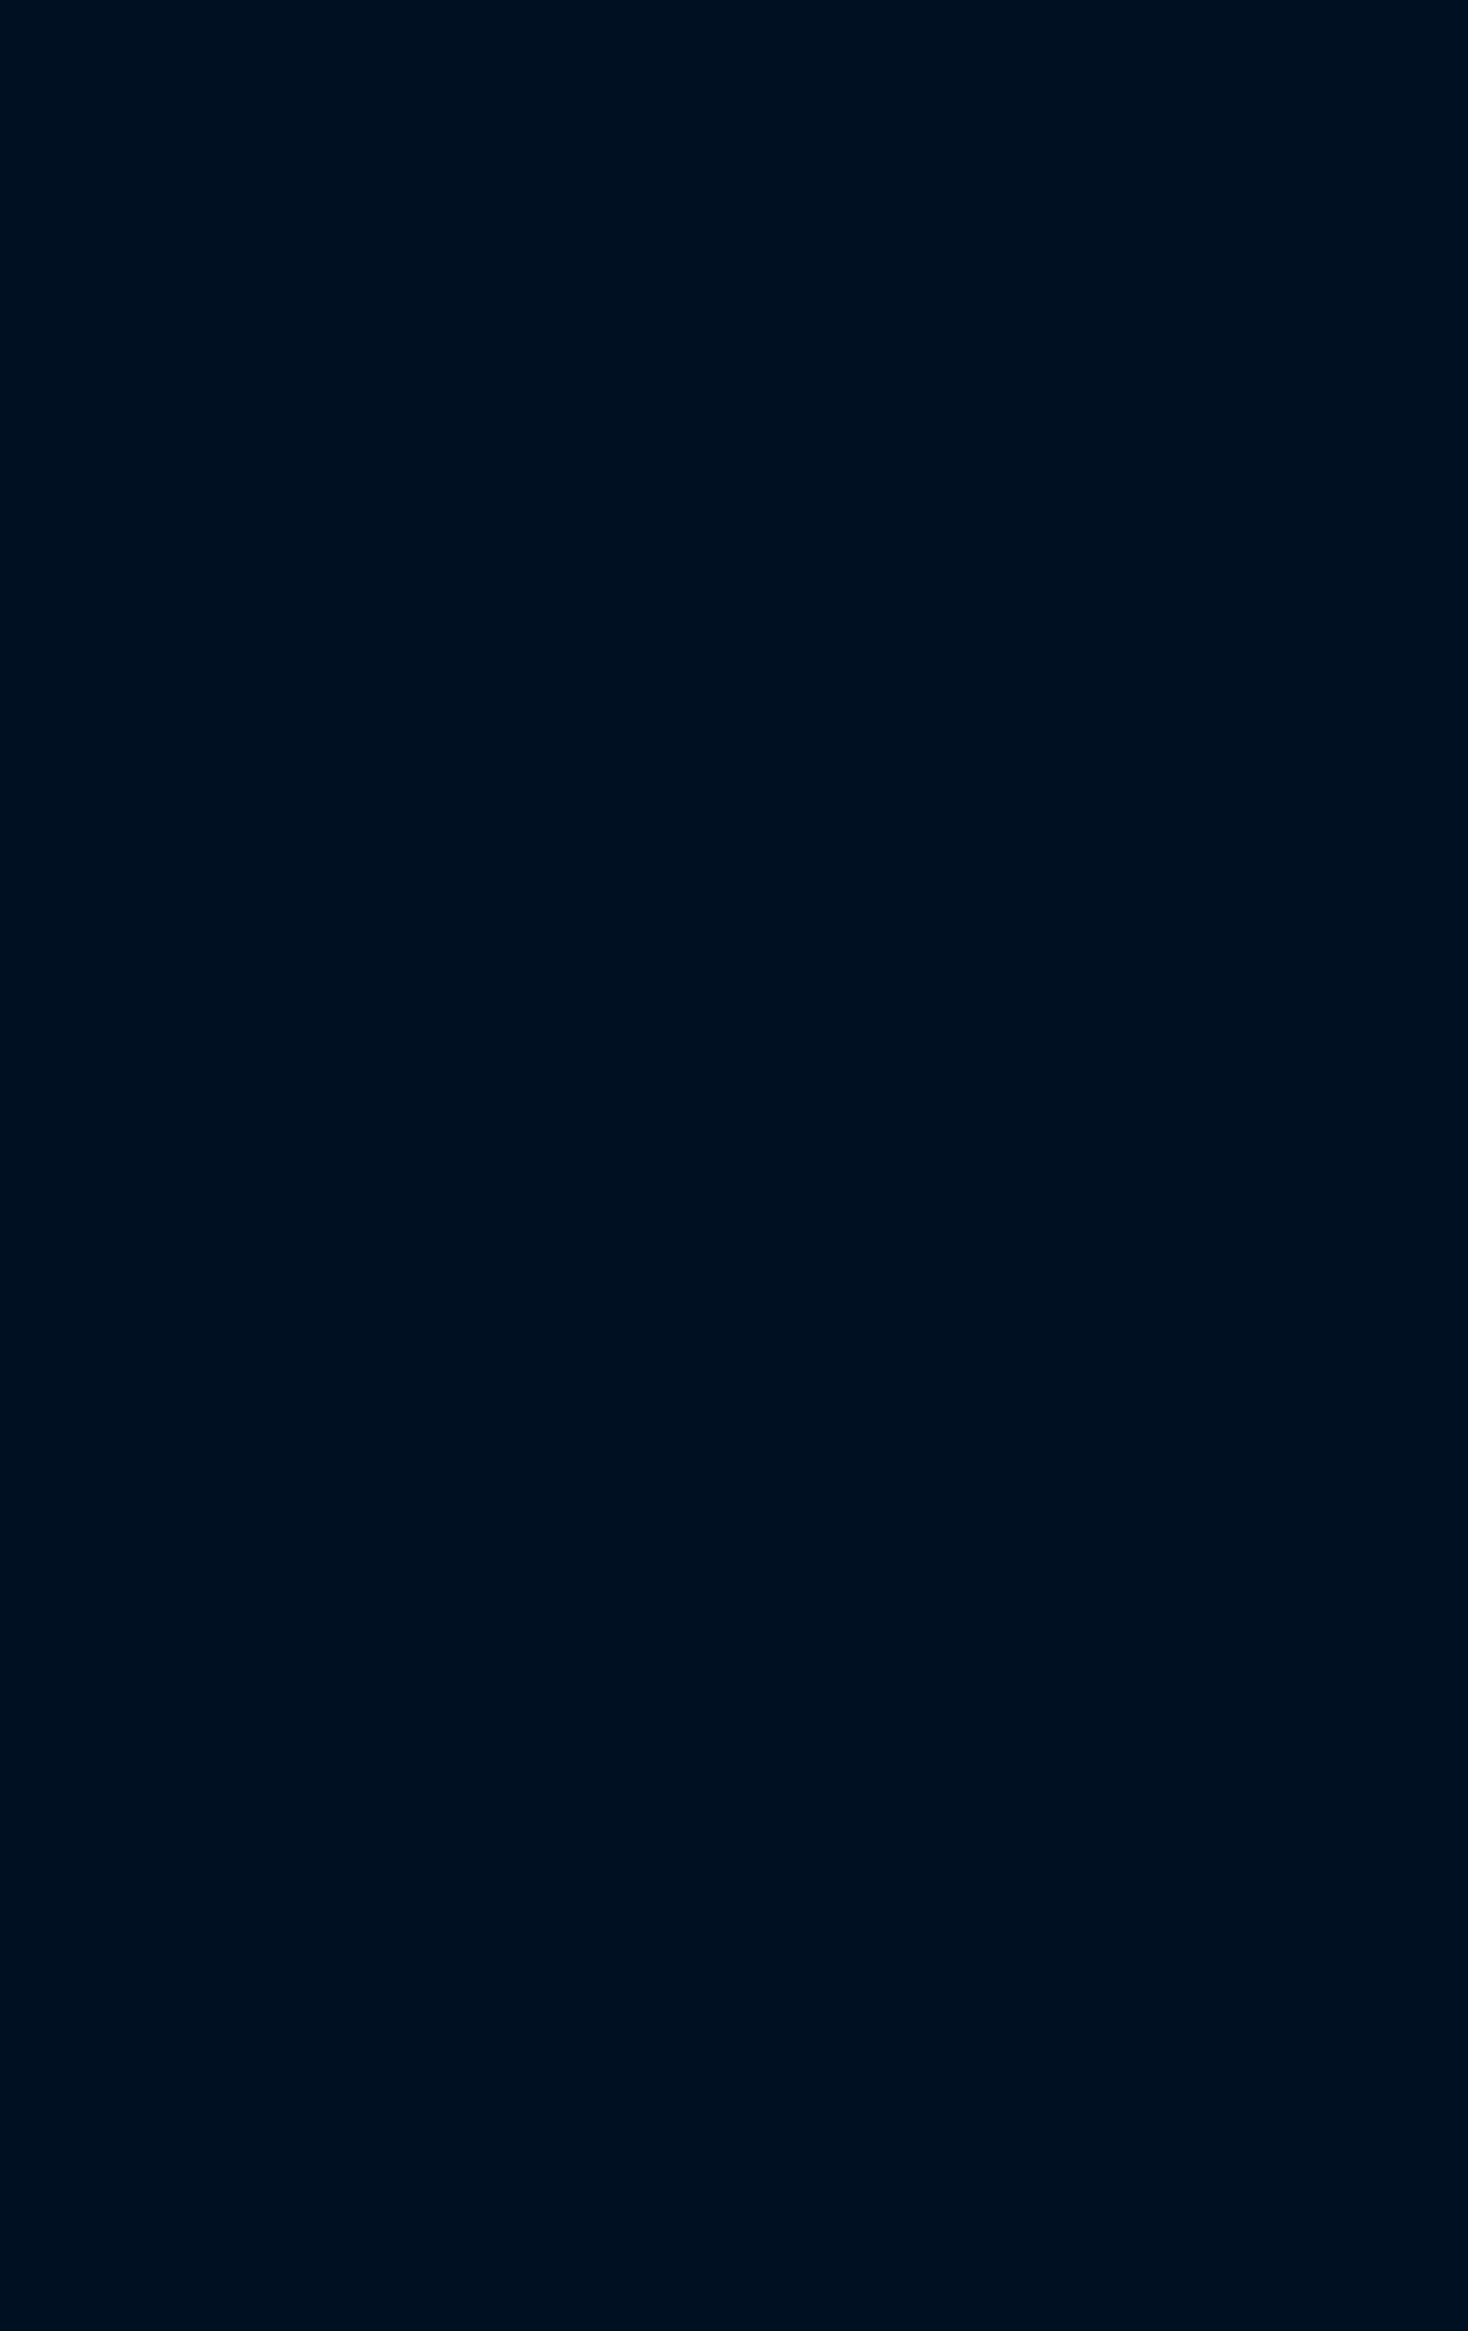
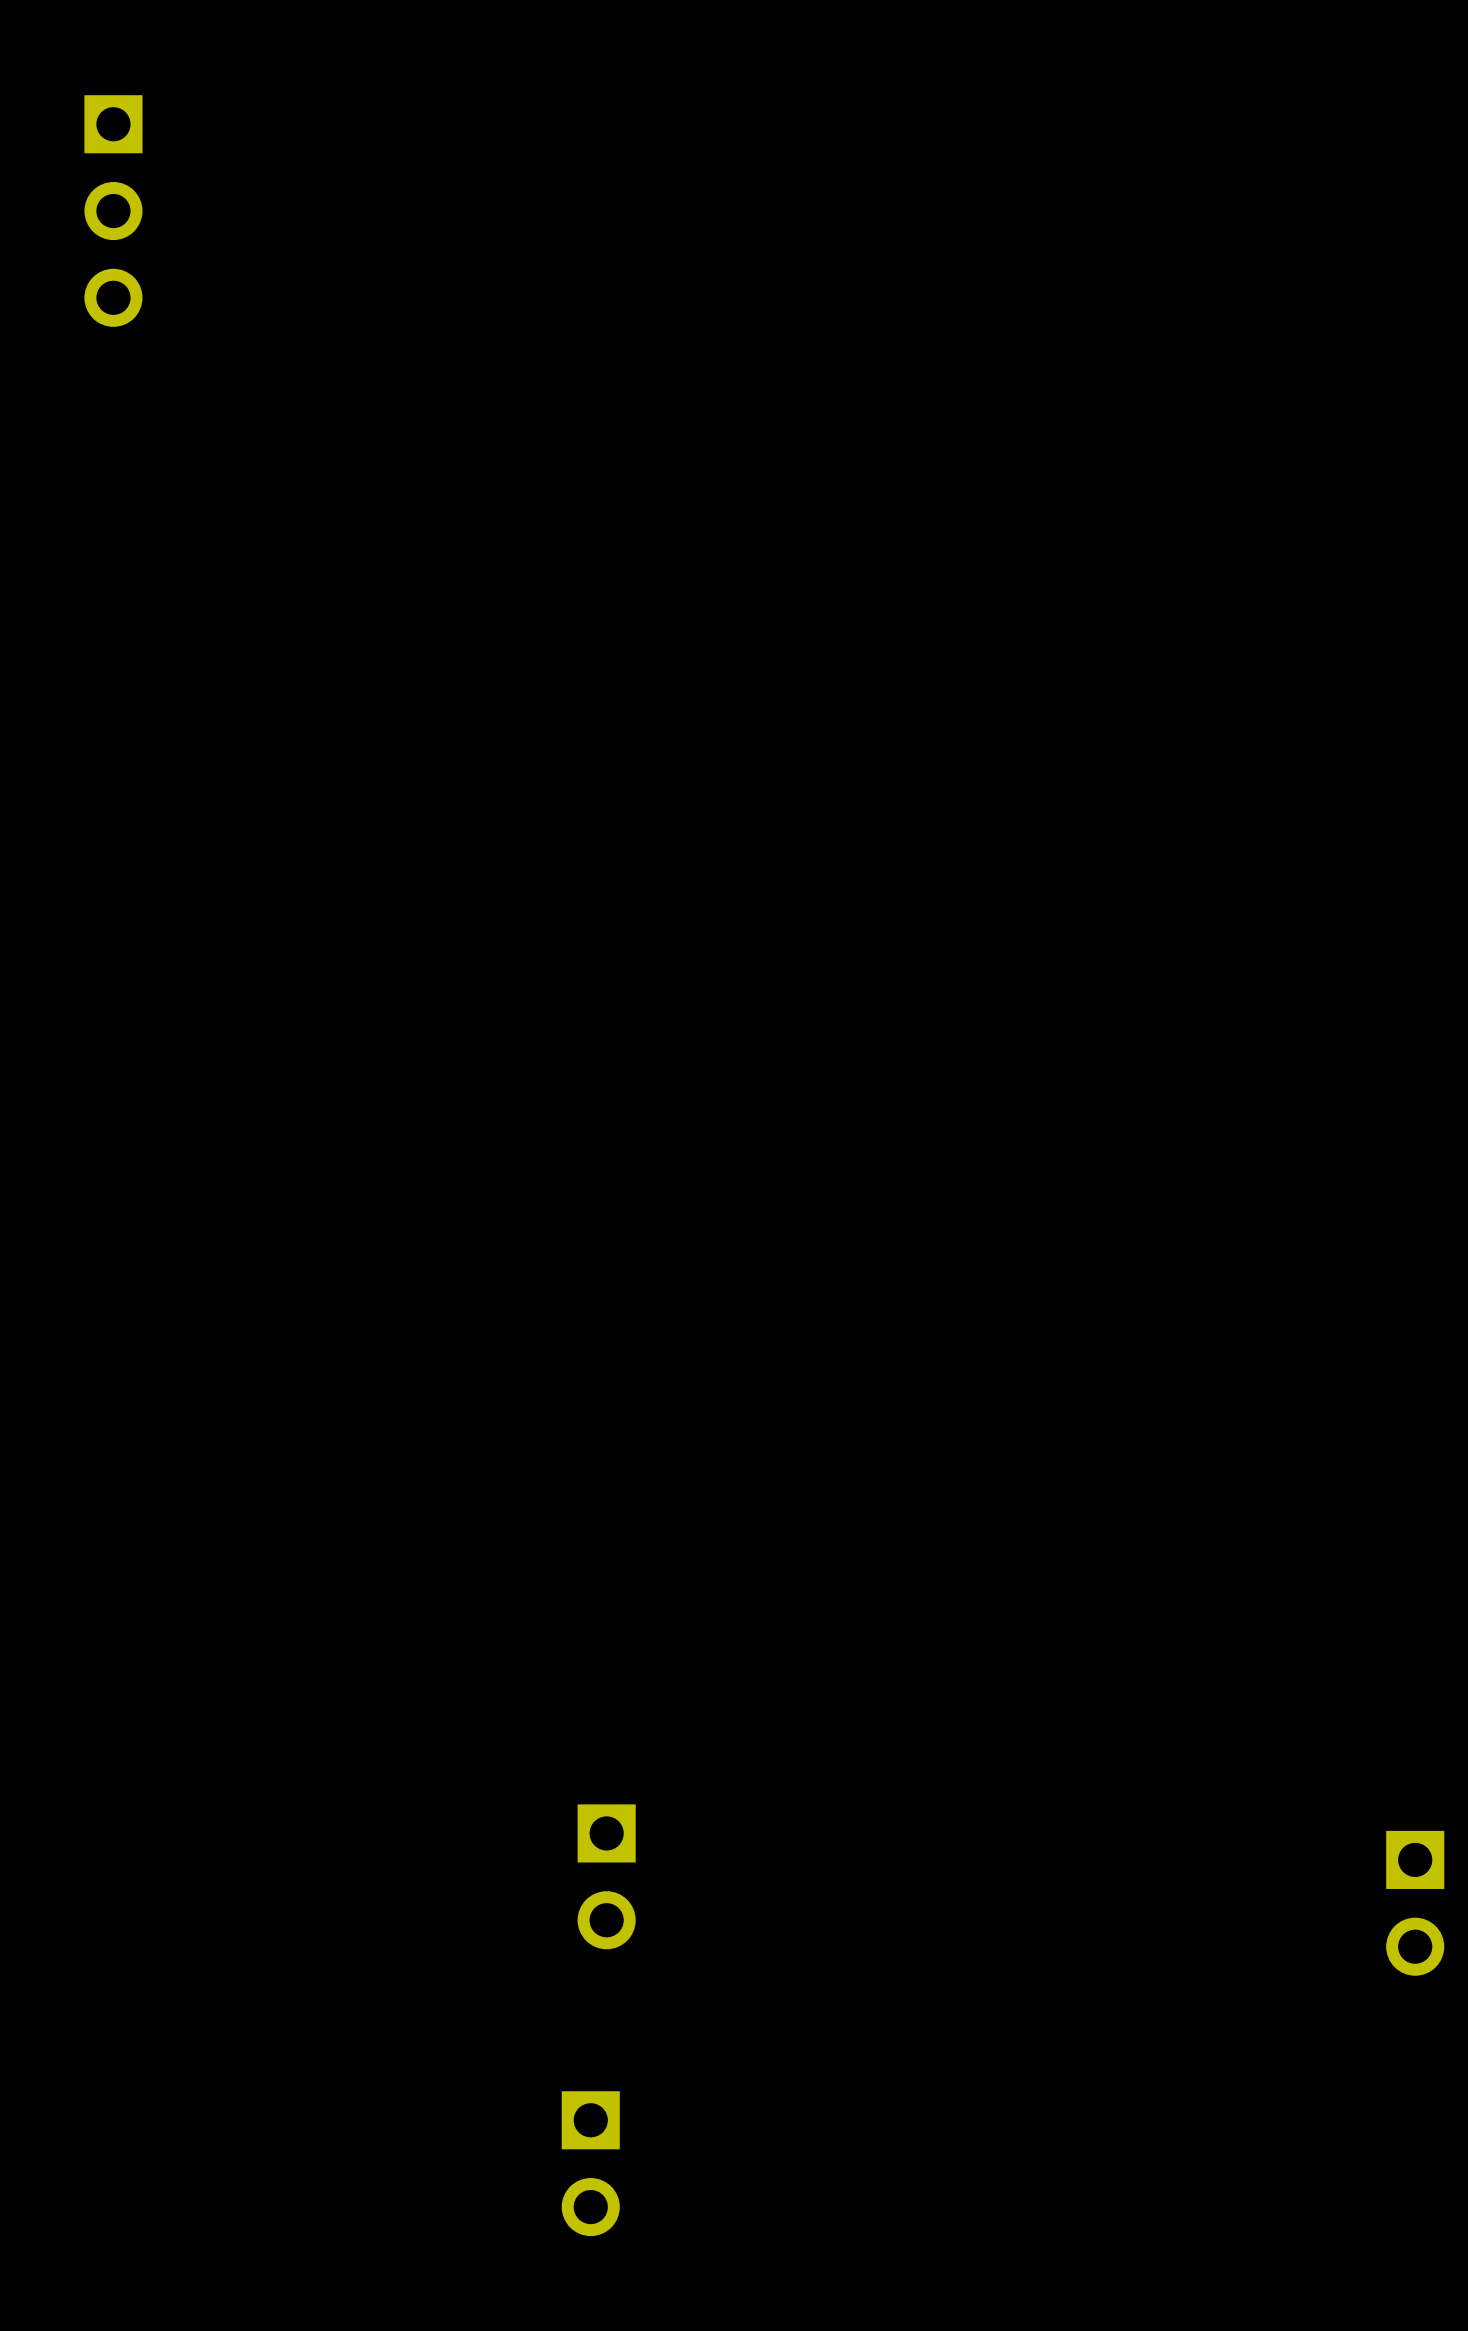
part: none -> (113, 211)
part: none -> (606, 1876)
part: none -> (1415, 1903)
part: none -> (590, 2163)

